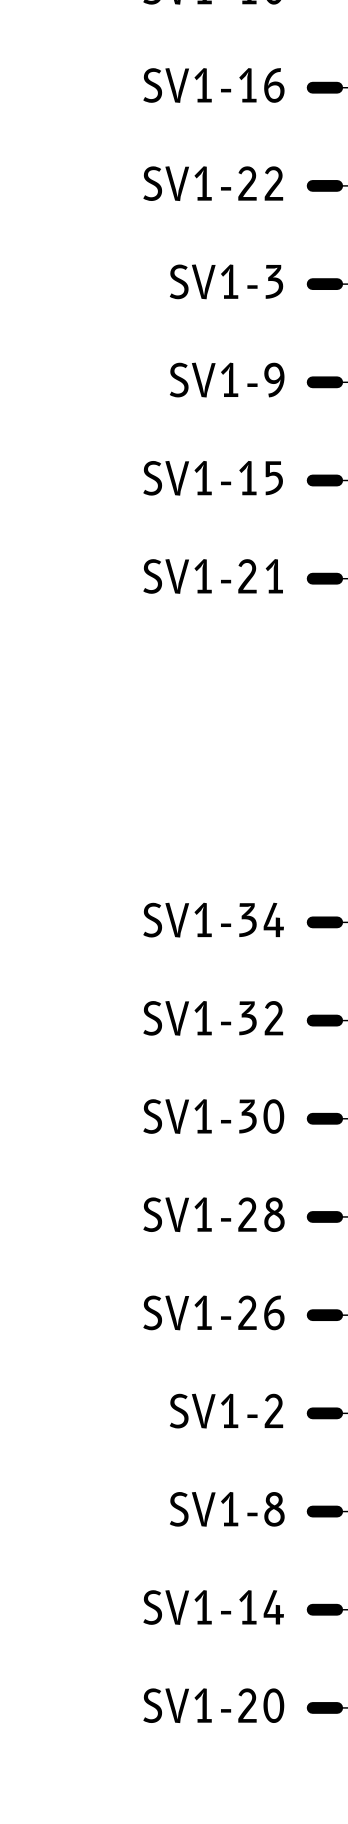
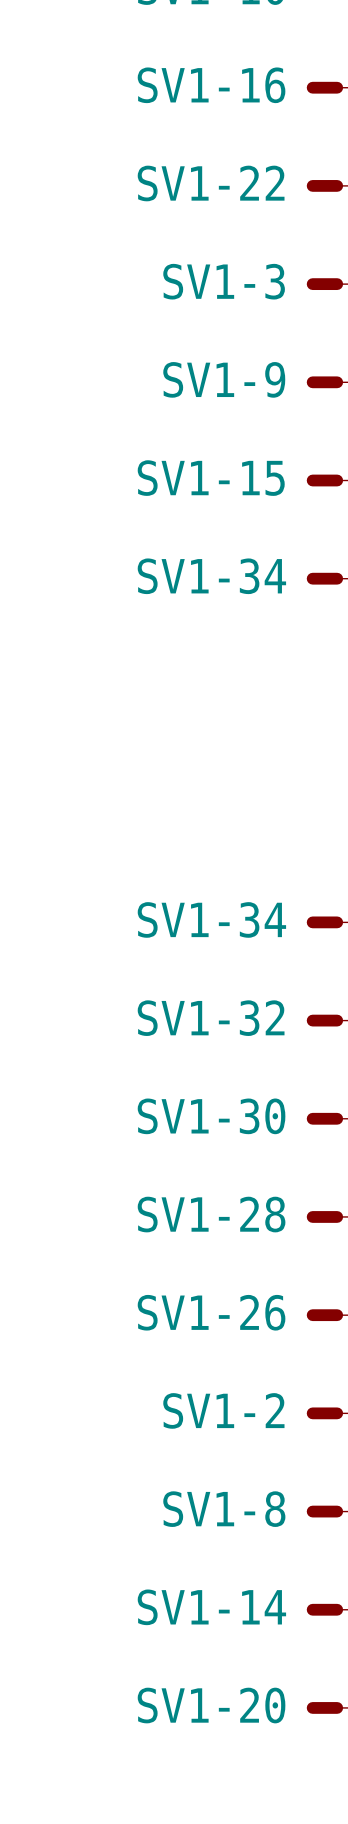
SV1-21 name: SV1-21 (213, 576) -> SV1-34 (211, 576)

